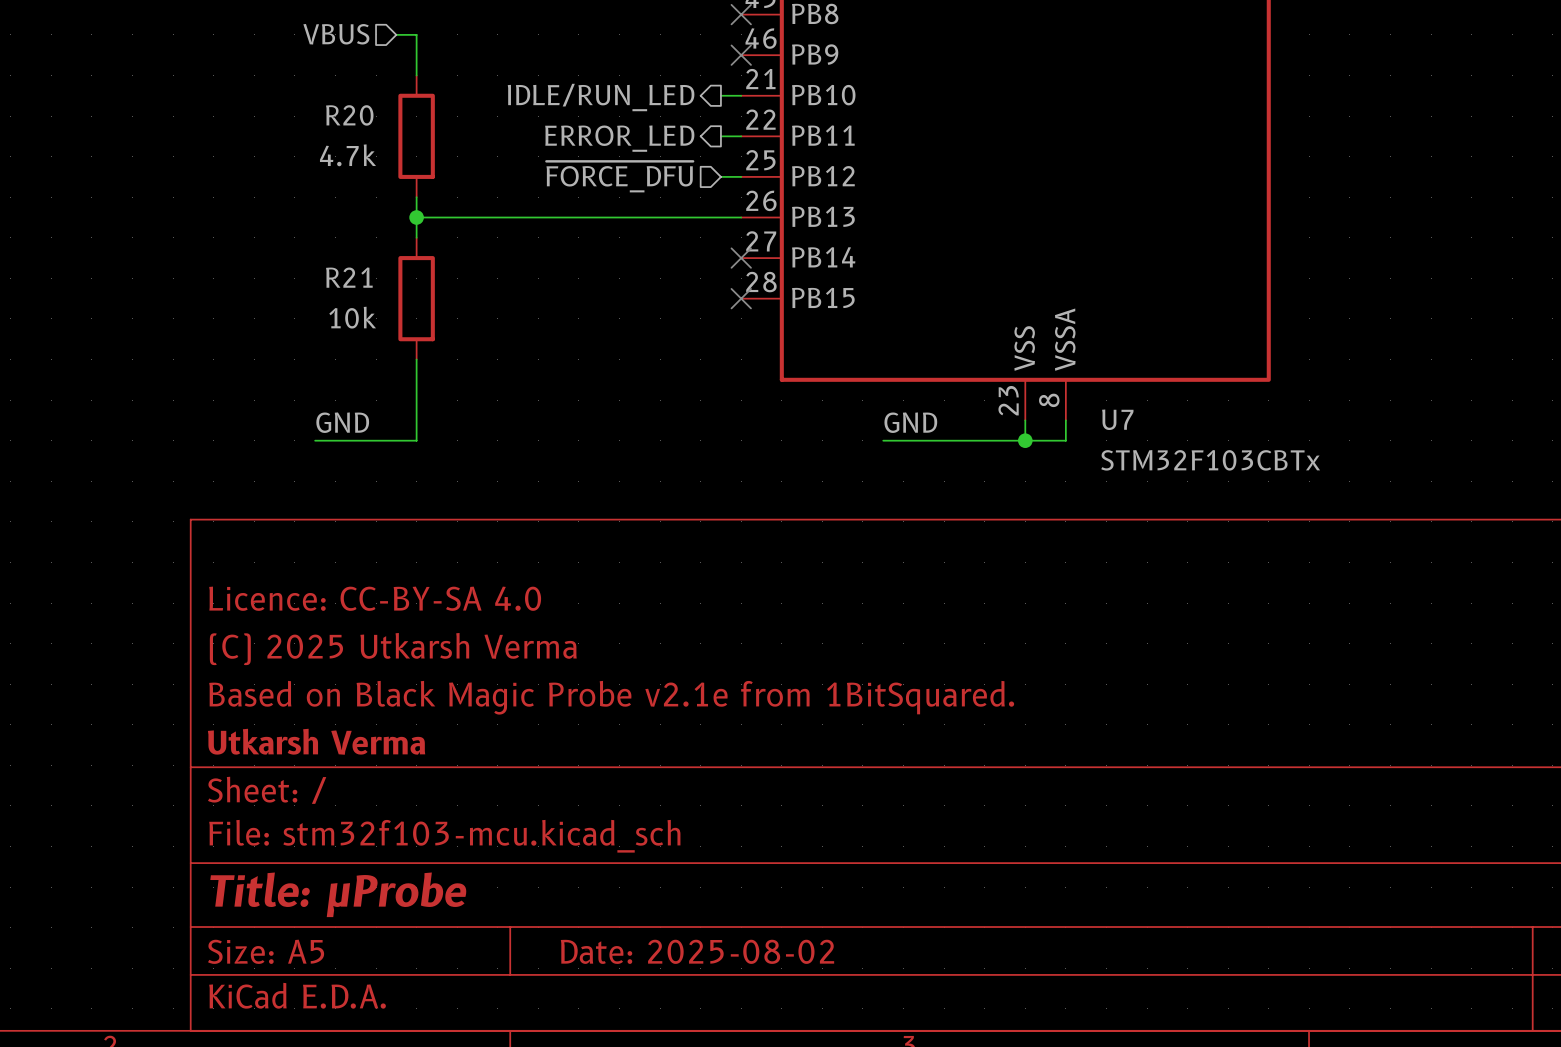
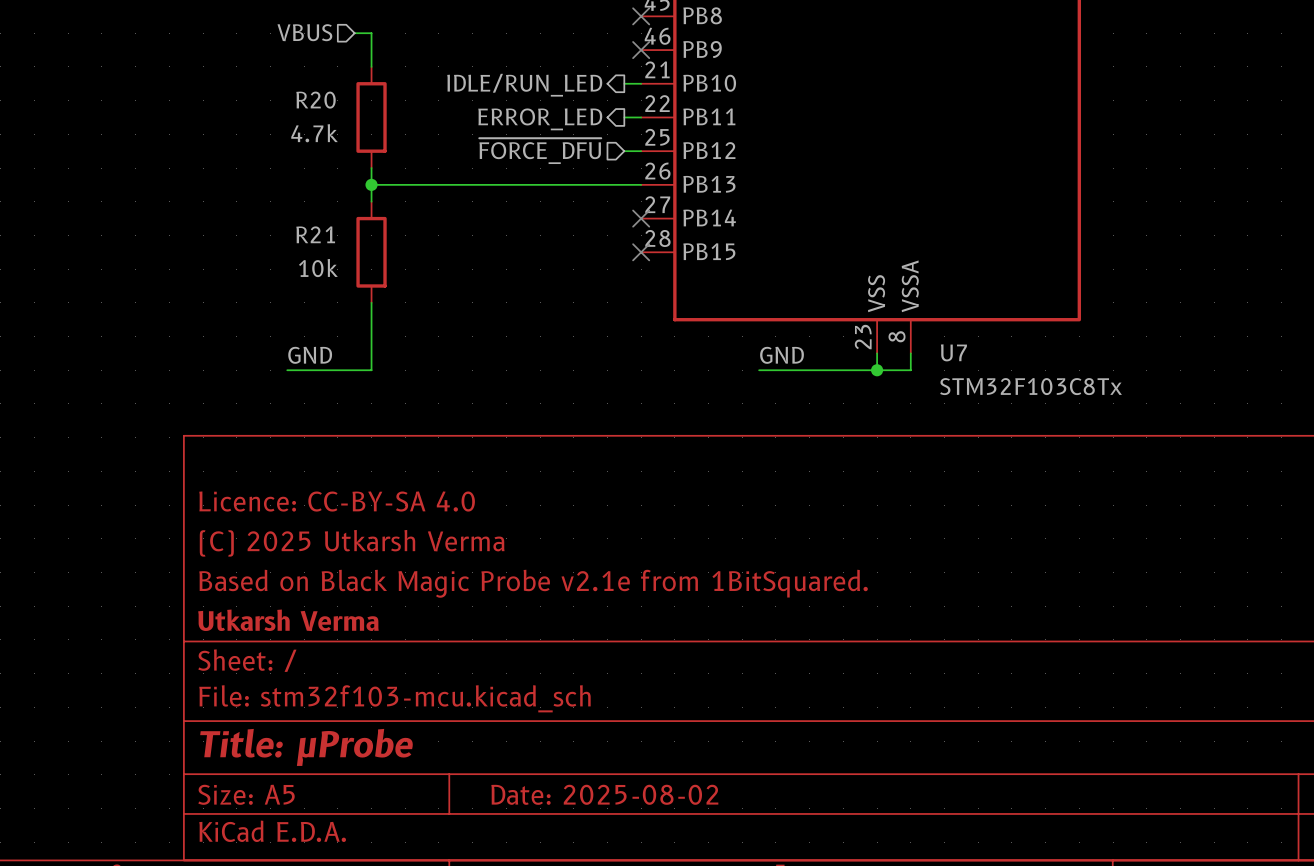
U7 value: STM32F103CBTx (1210, 460) -> STM32F103C8Tx (1031, 386)

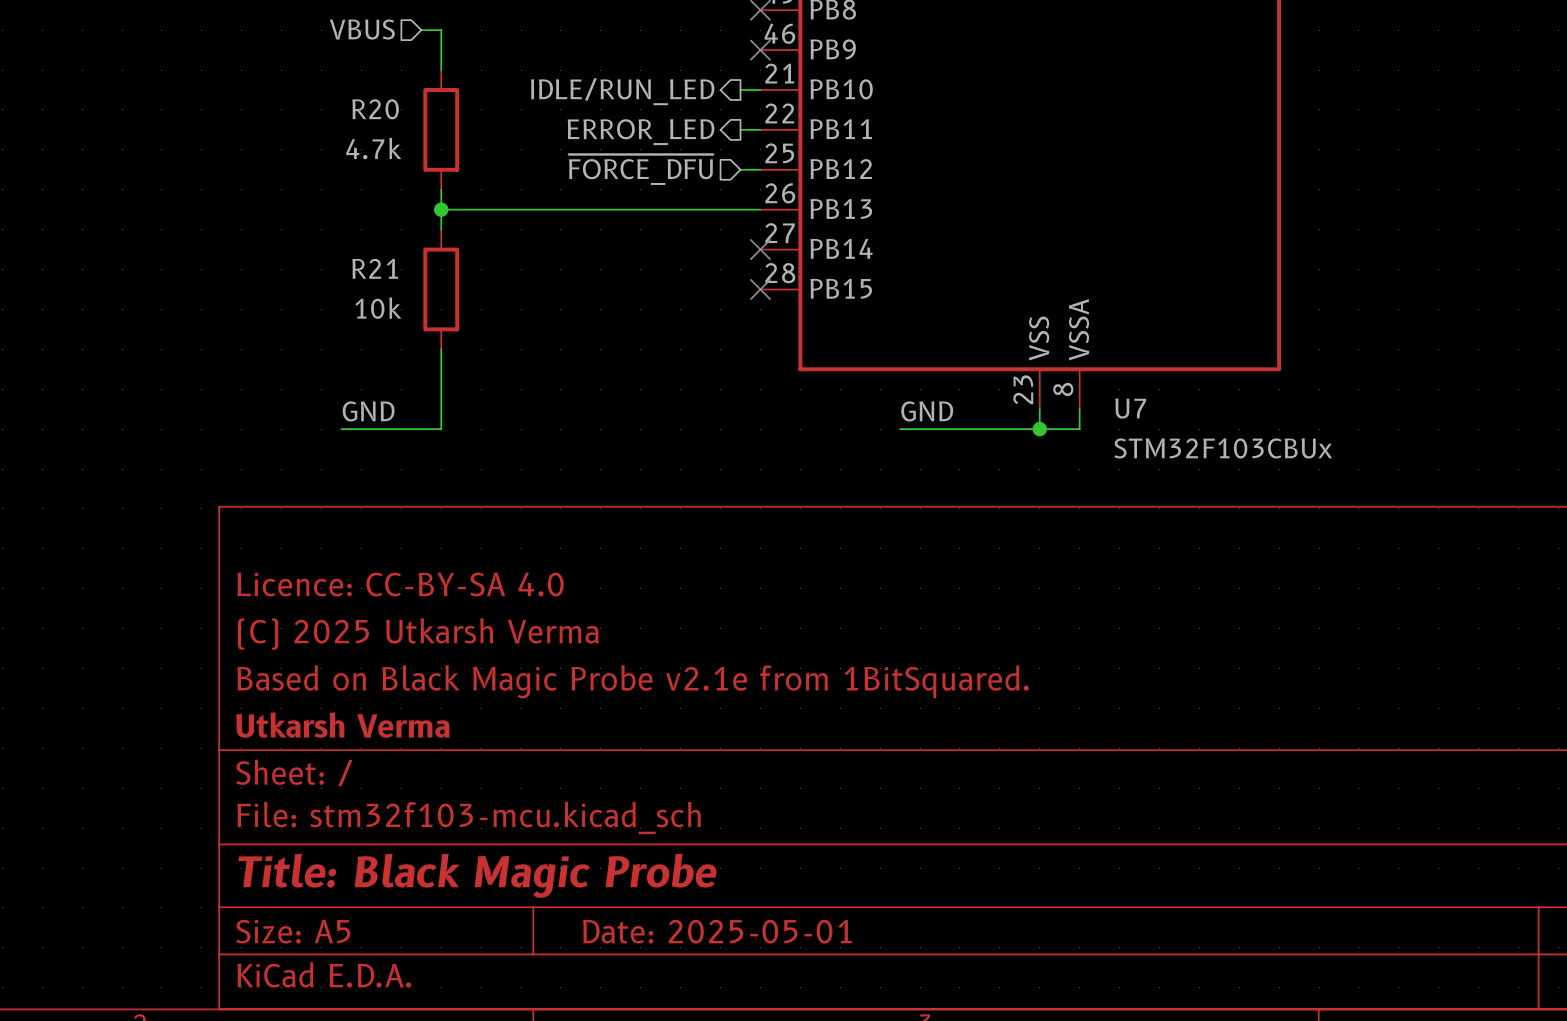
U7 value: STM32F103C8Tx (1031, 386) -> STM32F103CBUx (1223, 448)
title block: Title: μProbe (306, 747) -> Title: Black Magic Probe (477, 875)
title block: Date: 2025-08-02 (604, 794) -> Date: 2025-05-01 (717, 931)

